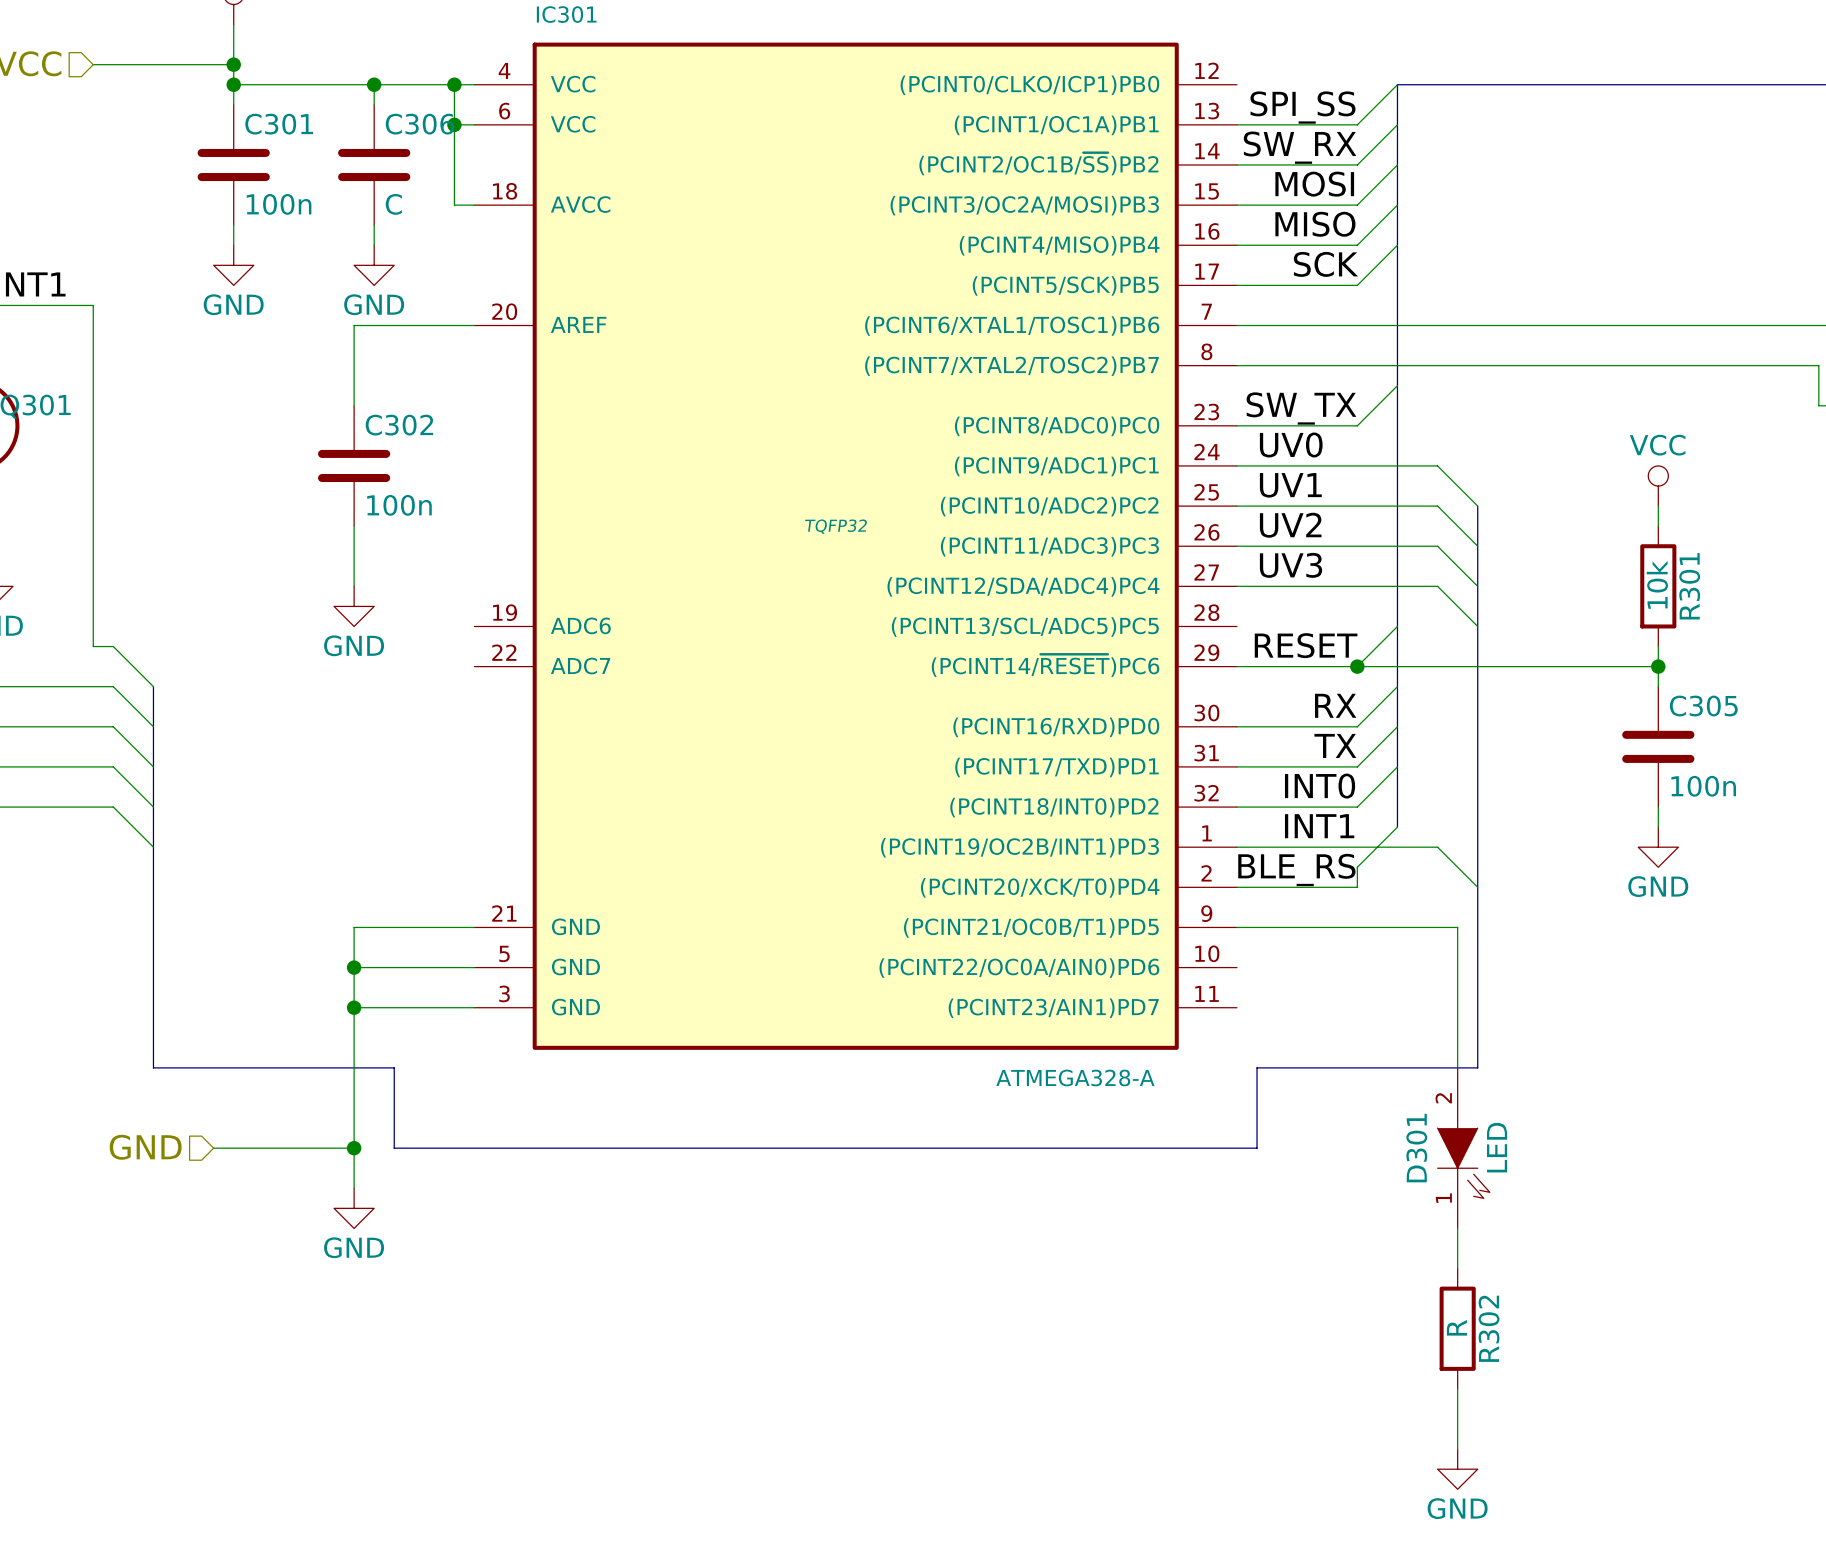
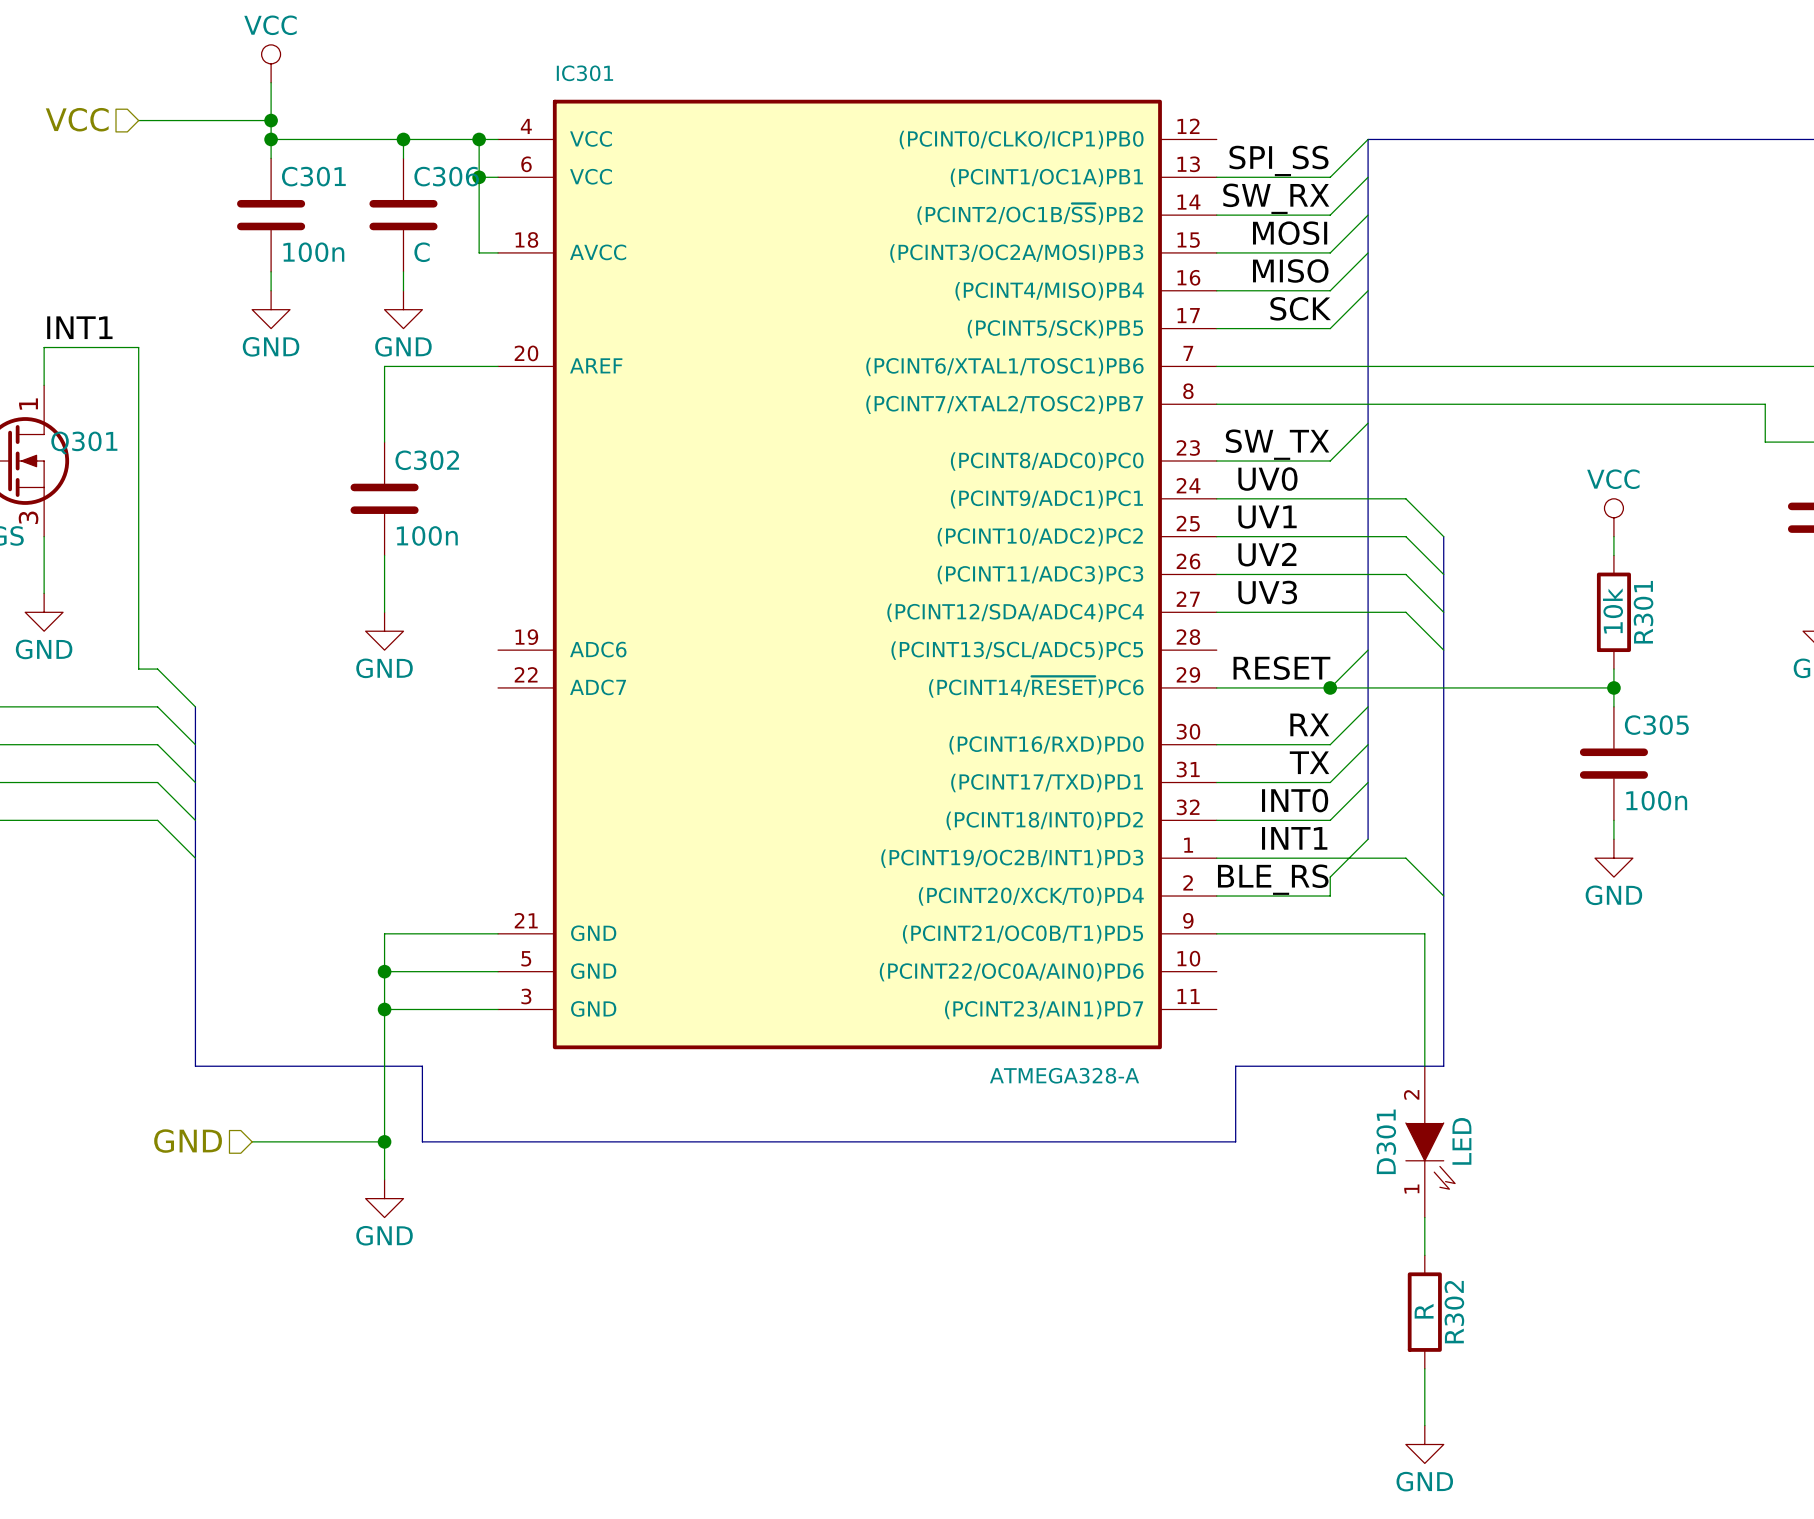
IC301 text: TQFP32 (836, 526) -> none

